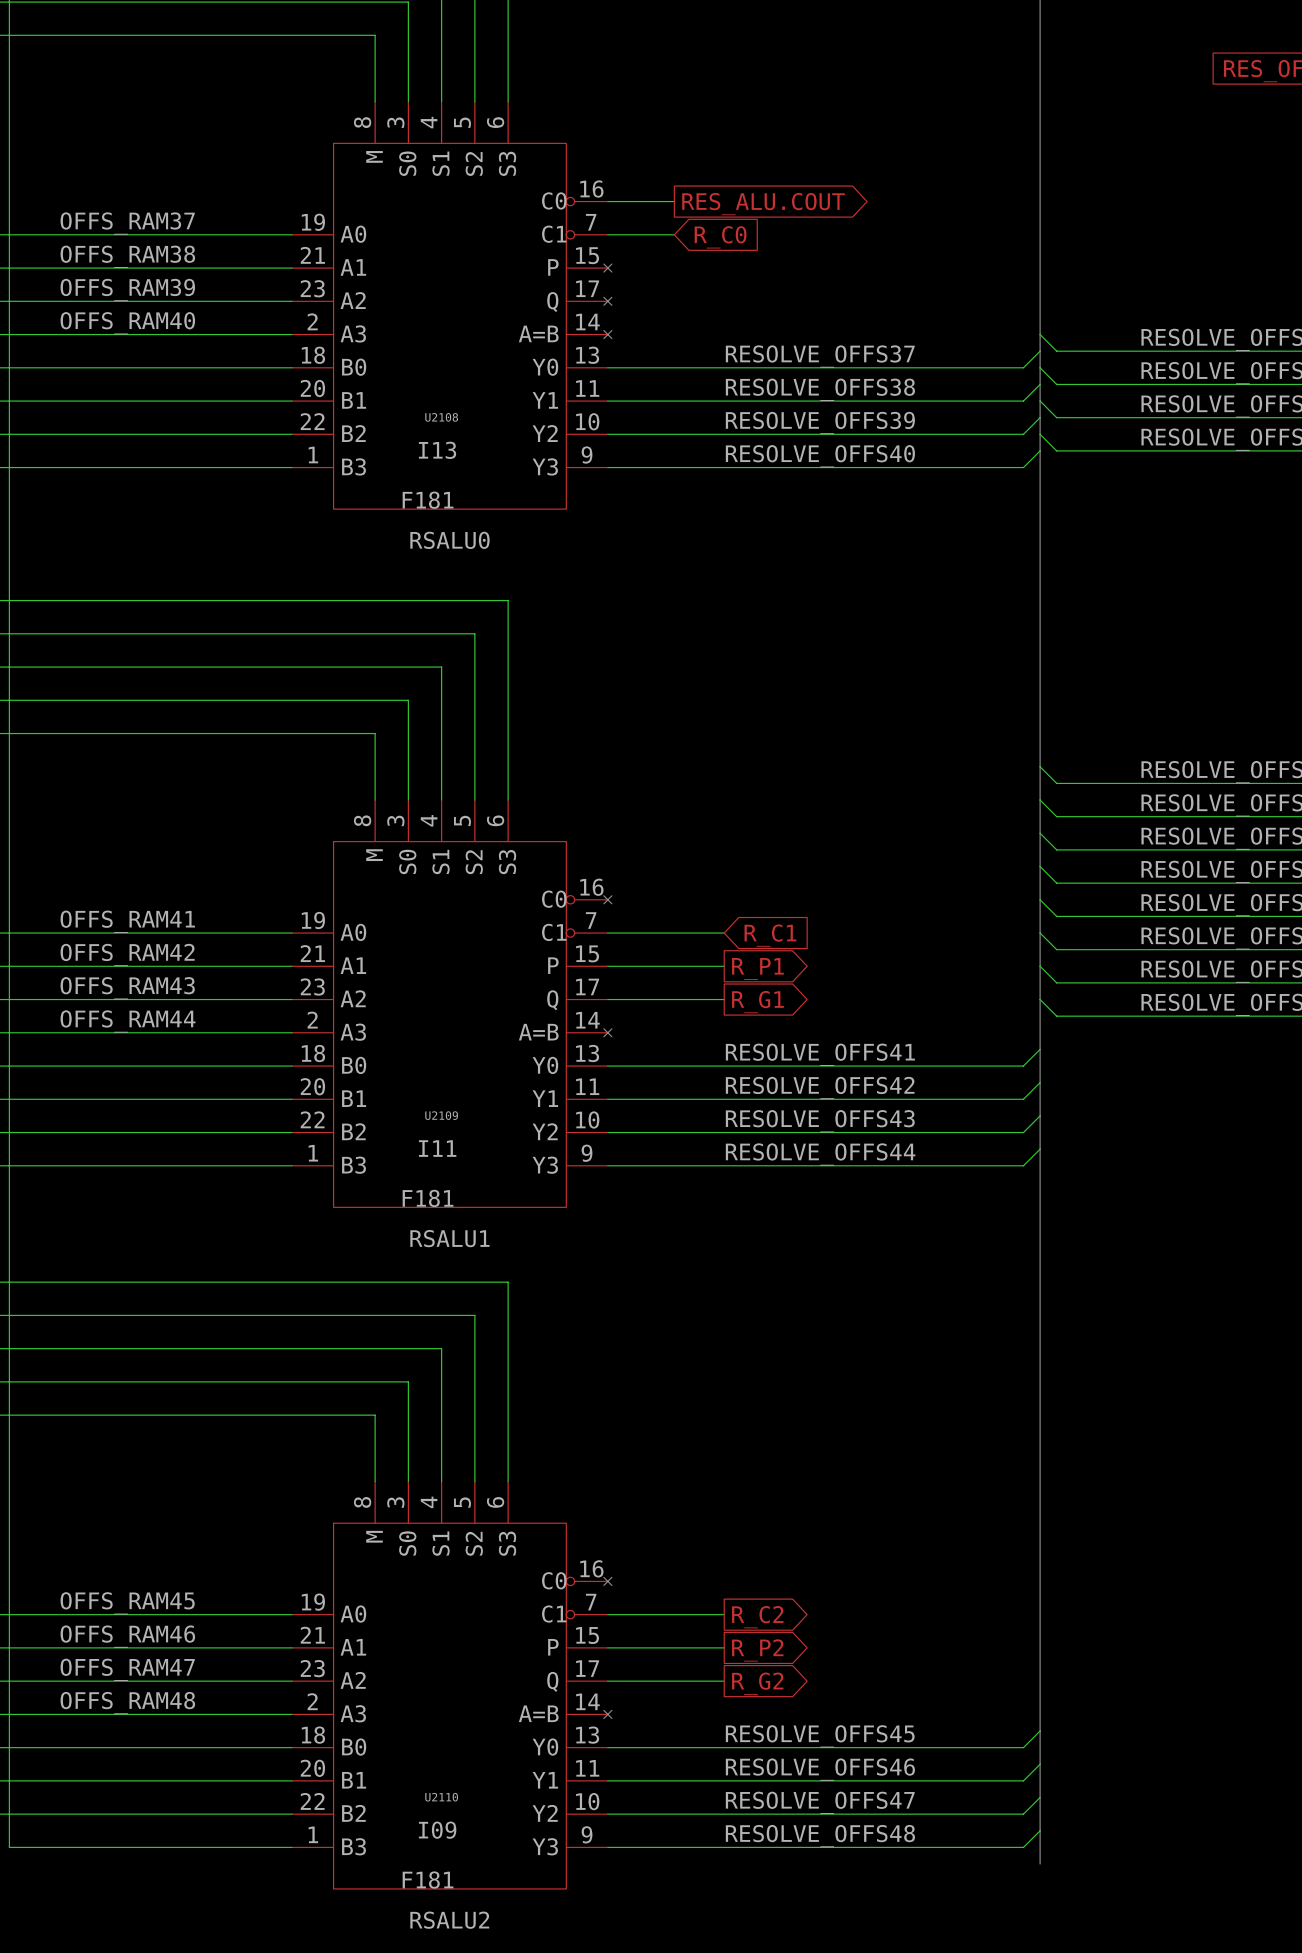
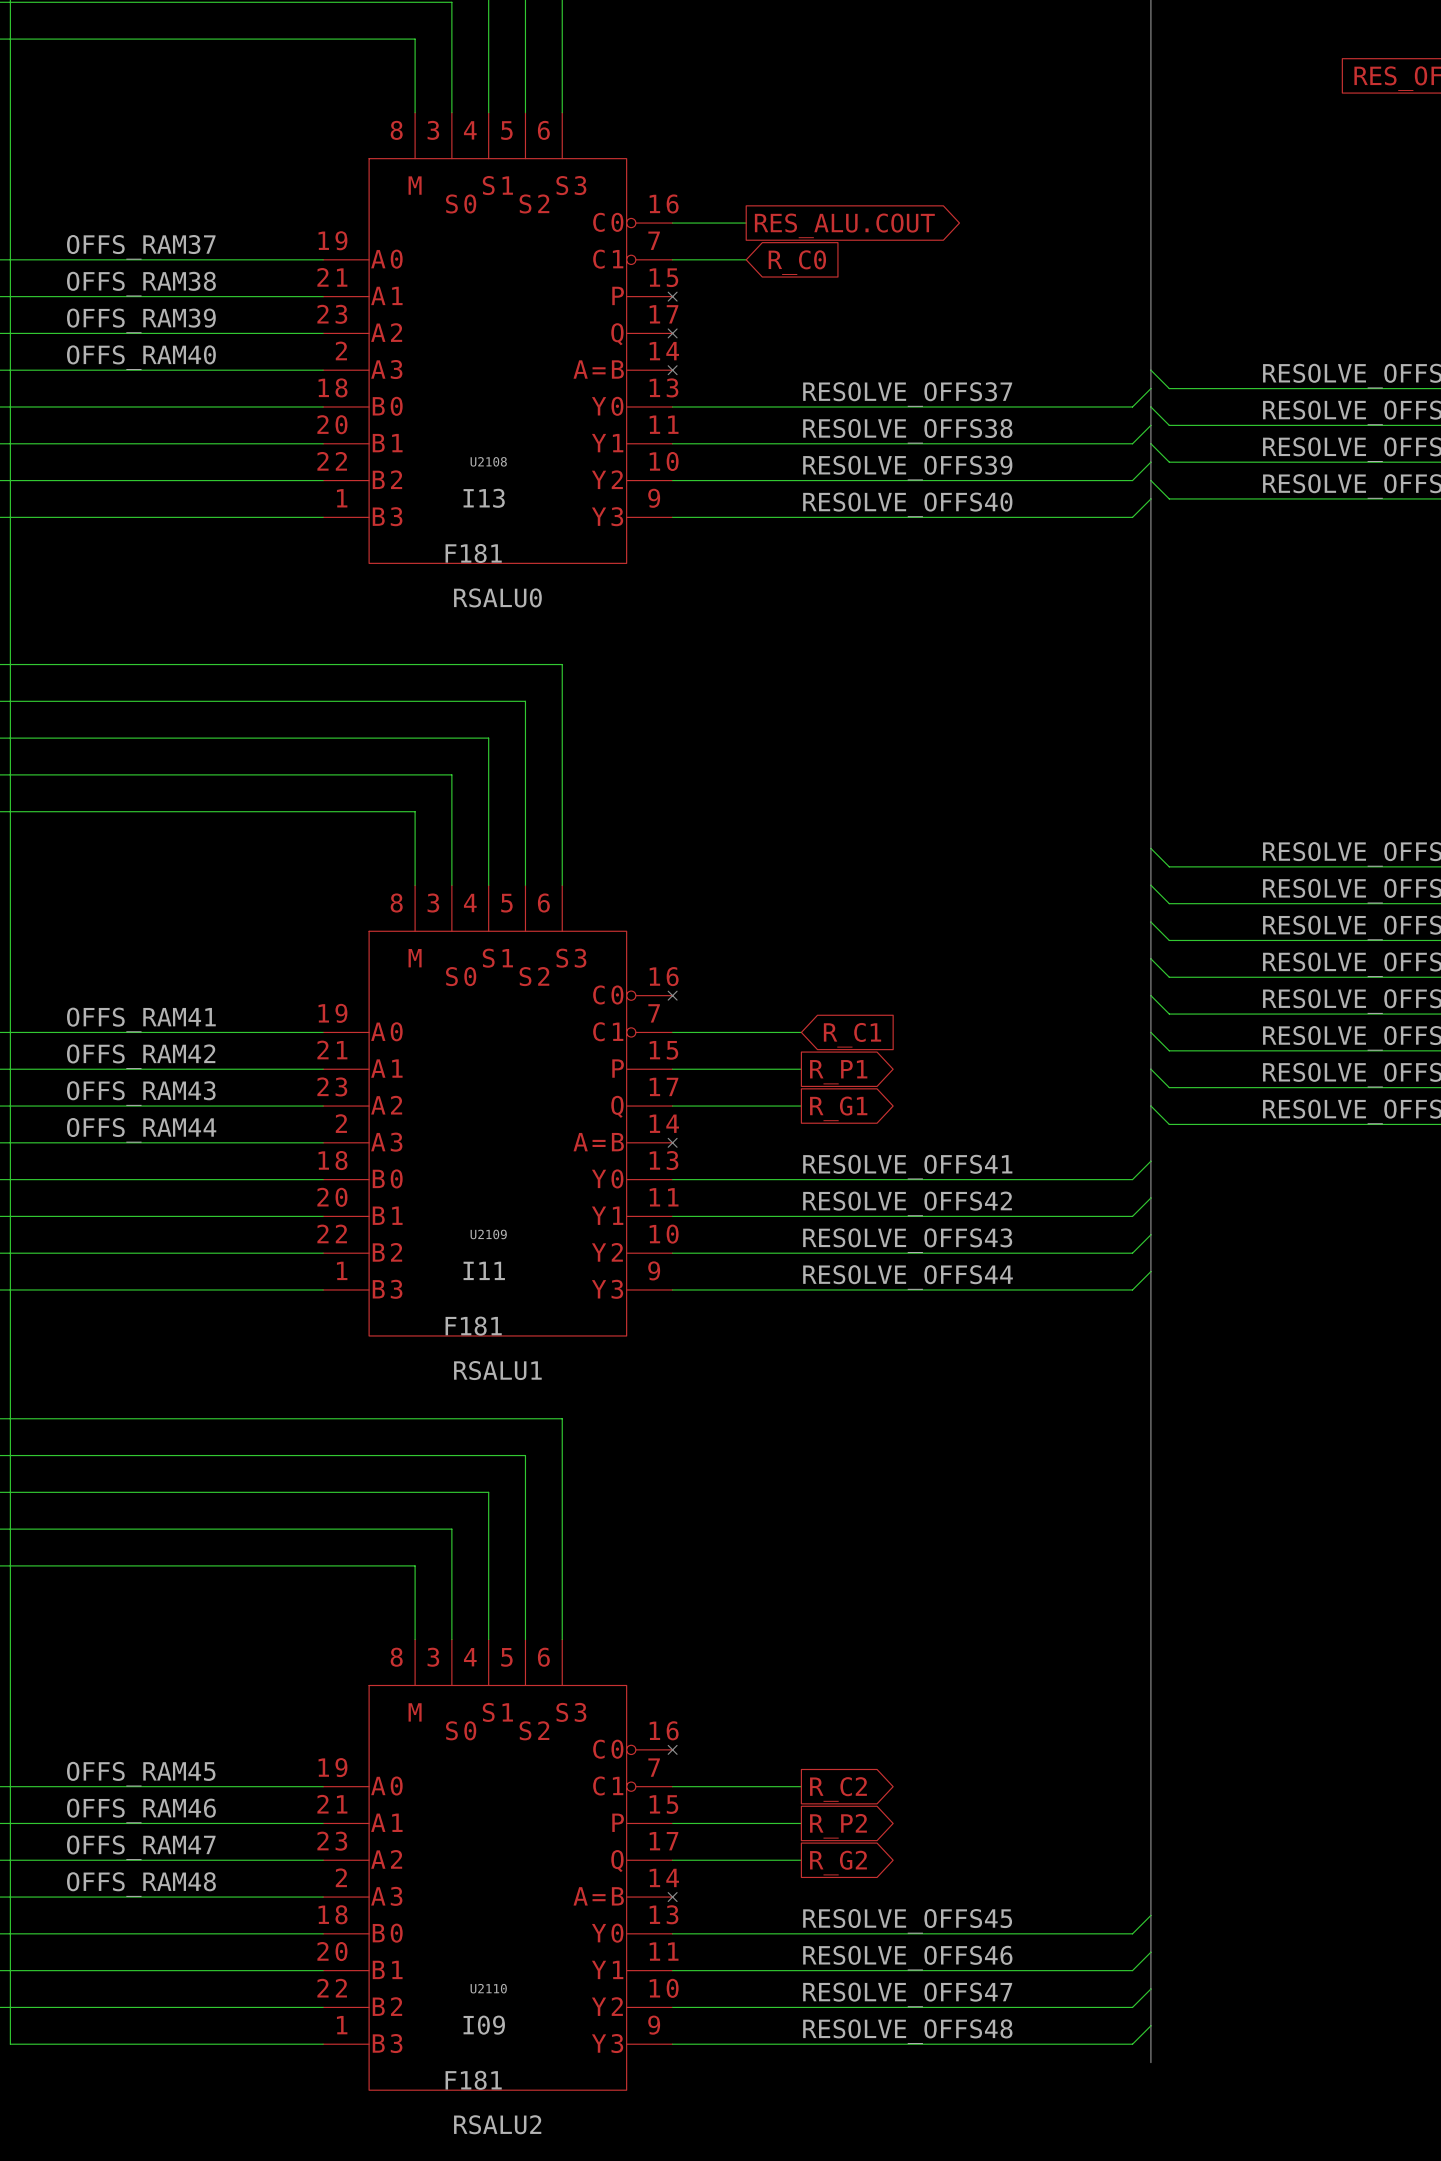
U2108 symbol: [292, 101, 608, 510] -> [323, 112, 673, 564]
U2109 symbol: [292, 800, 608, 1208] -> [323, 885, 673, 1336]
U2110 symbol: [292, 1481, 608, 1889] -> [323, 1639, 673, 2091]

